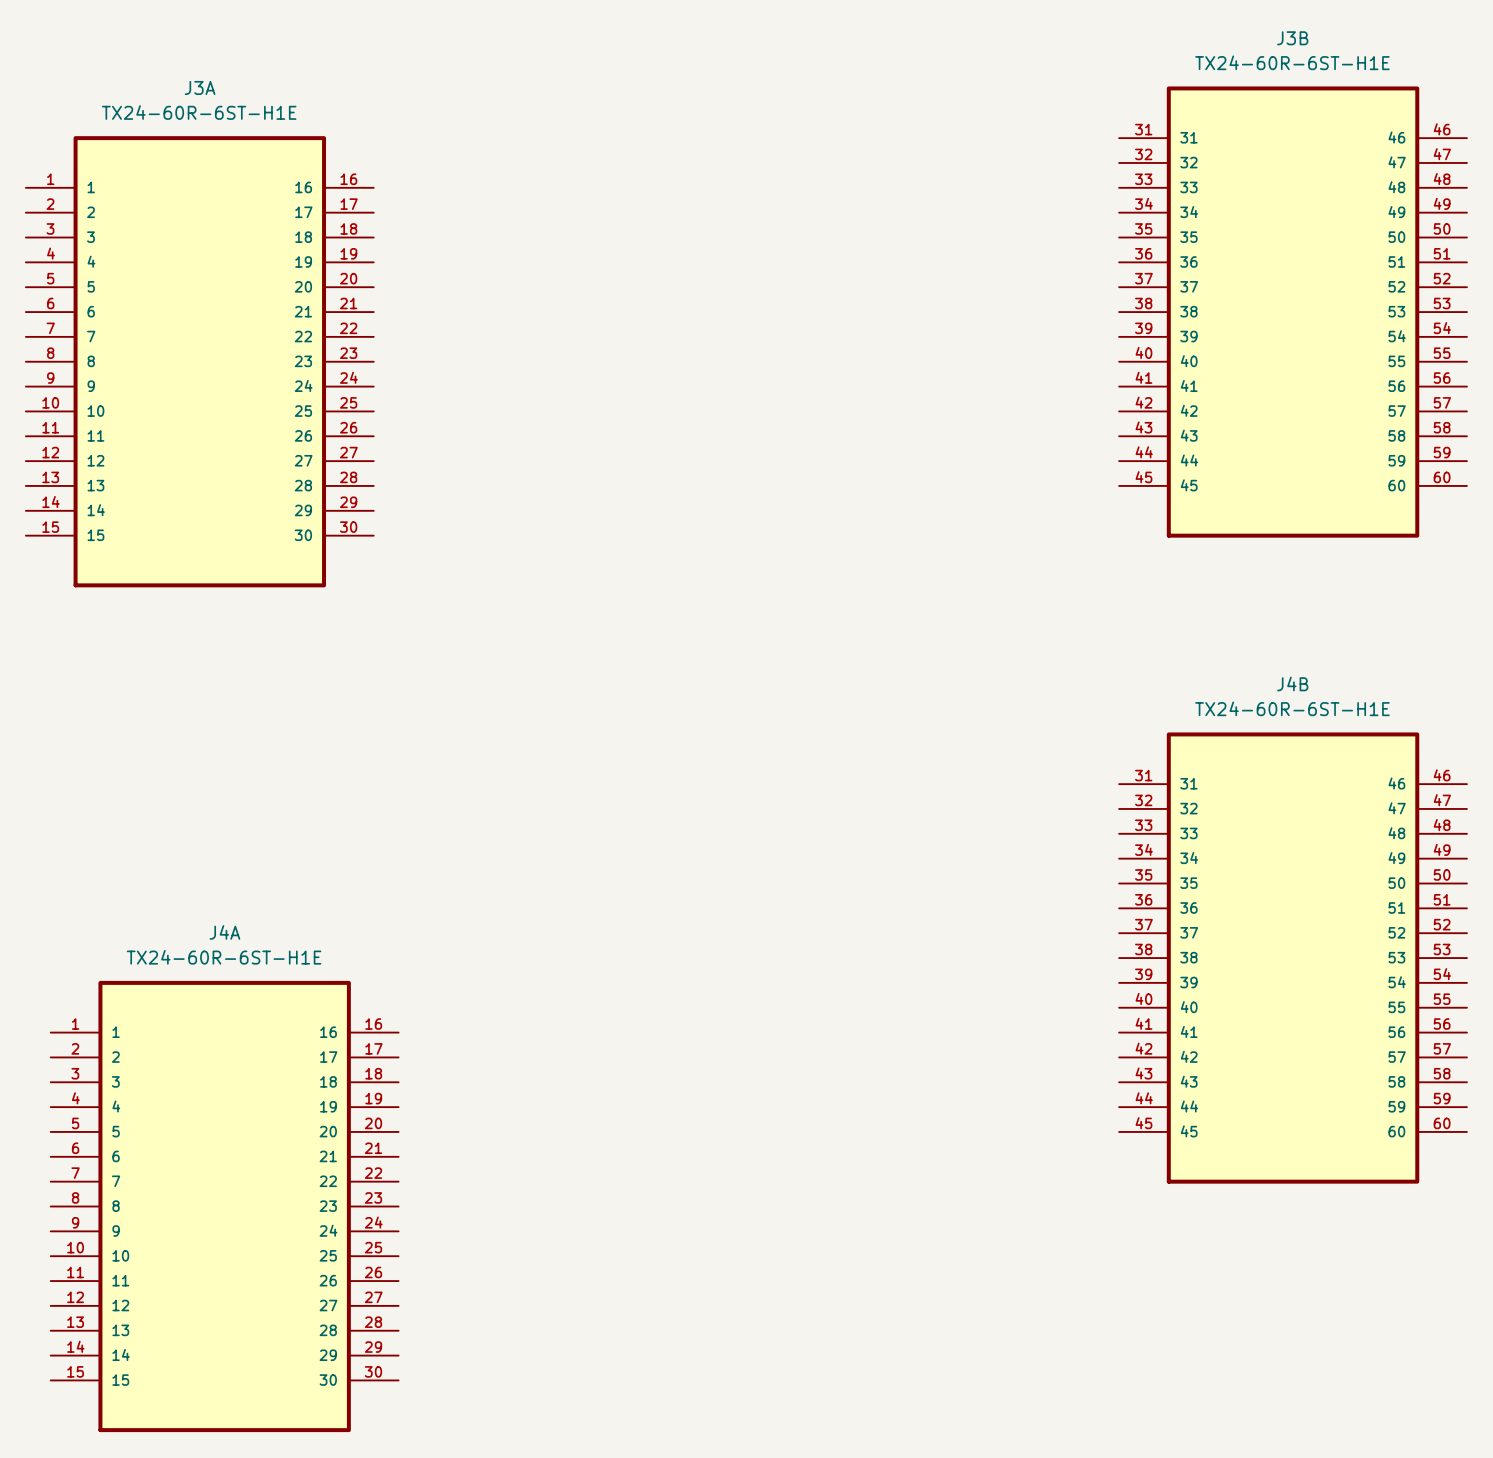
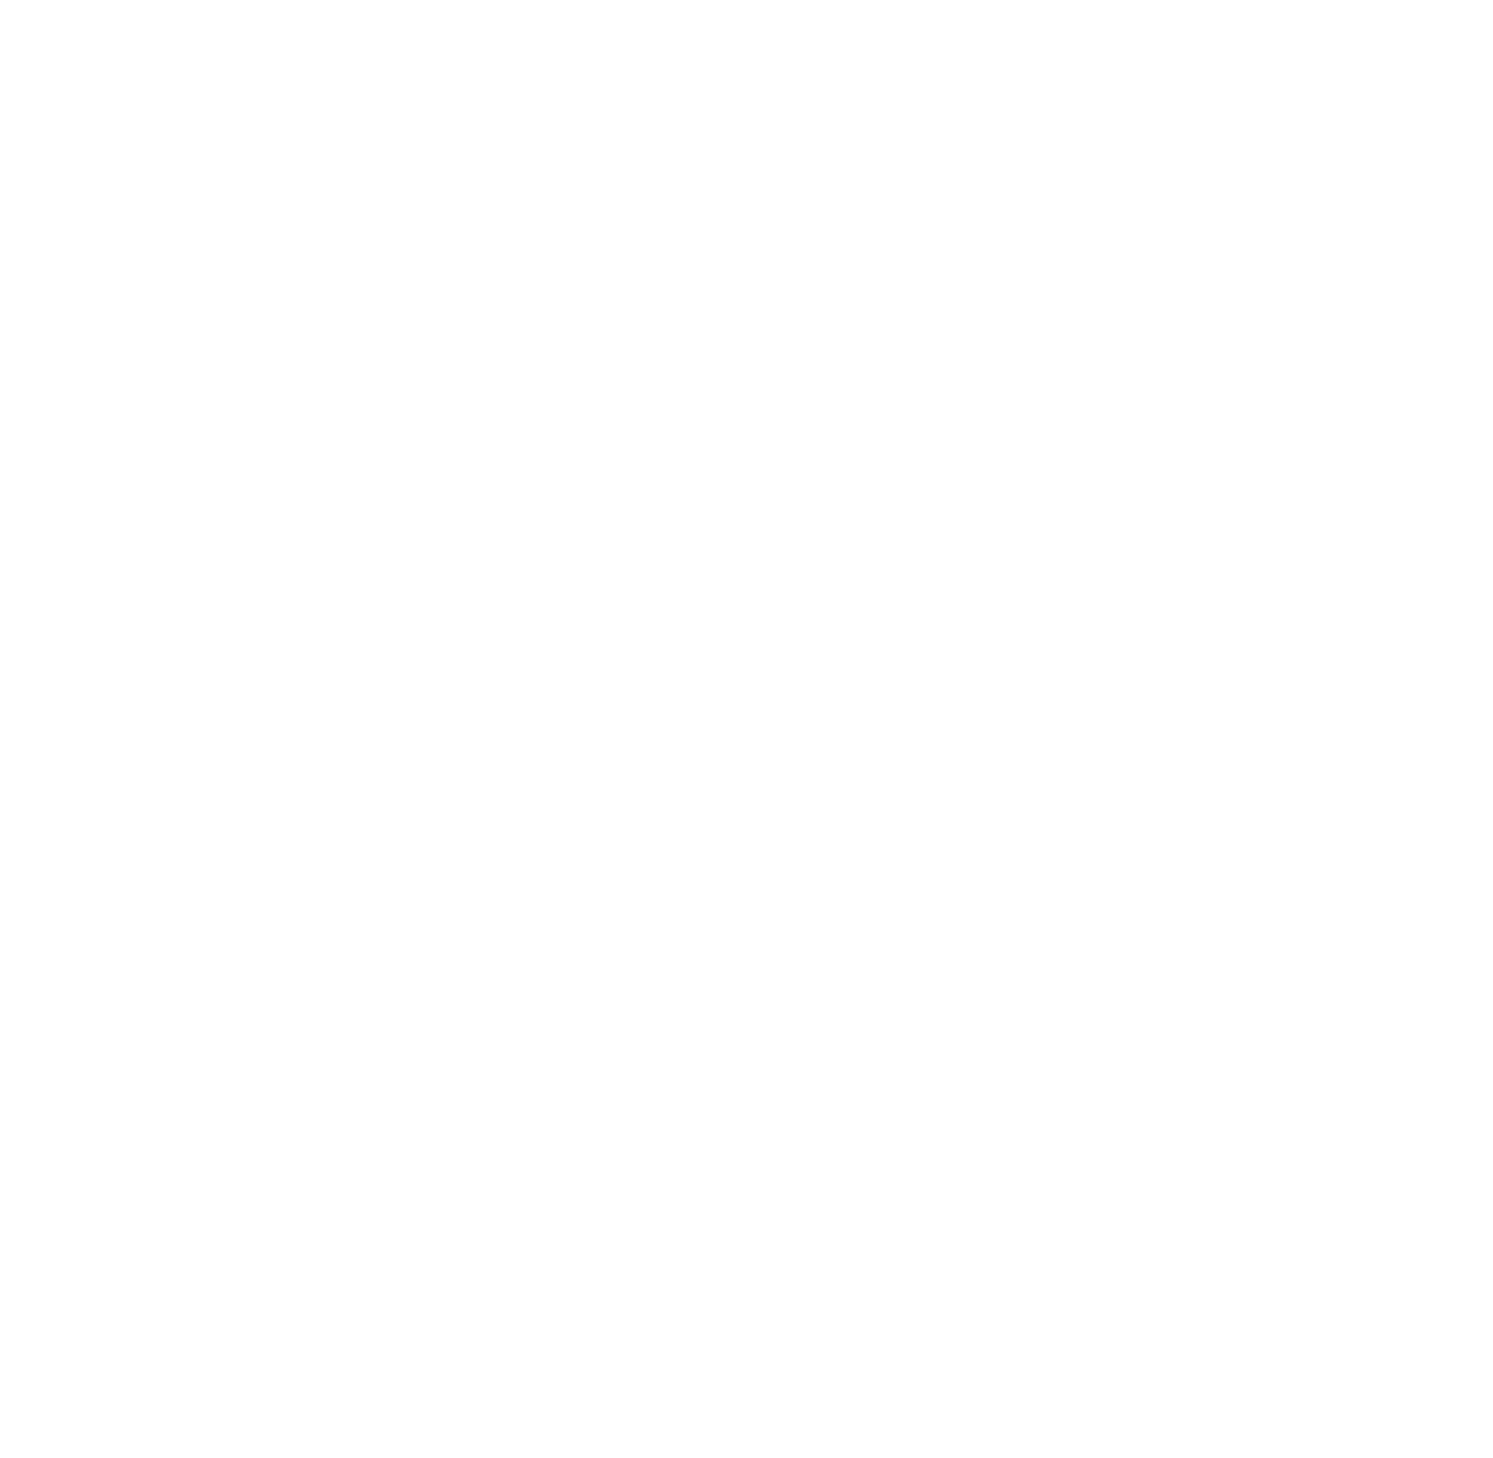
J3B: TX24-60R-6ST-H1E (1293, 312) -> none
J3A: TX24-60R-6ST-H1E (199, 361) -> none
J4B: TX24-60R-6ST-H1E (1293, 958) -> none
J4A: TX24-60R-6ST-H1E (224, 1206) -> none

